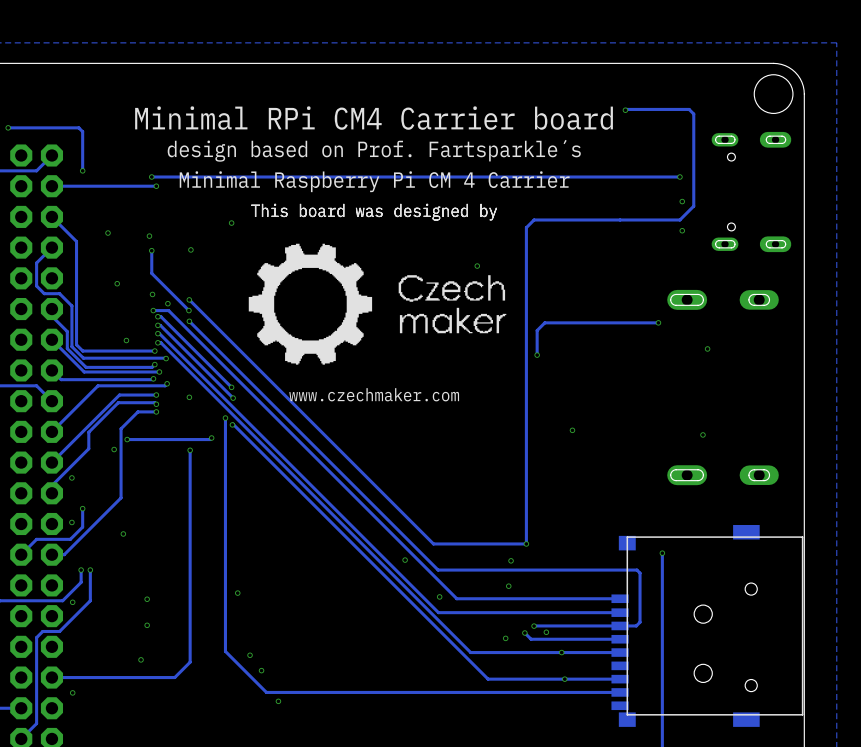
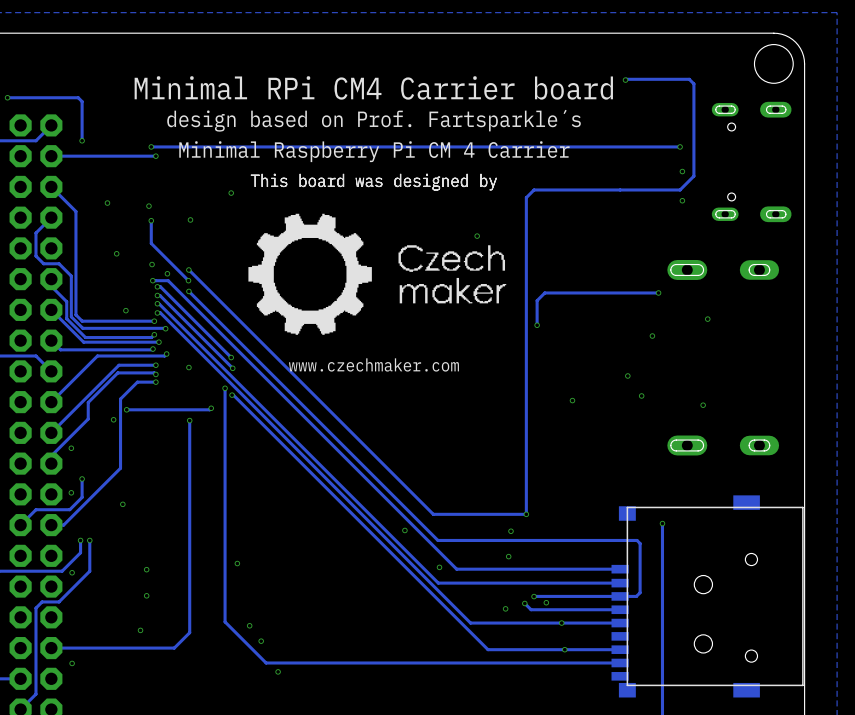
via: none -> (652, 336)
via: none -> (627, 375)
via: none -> (641, 395)

